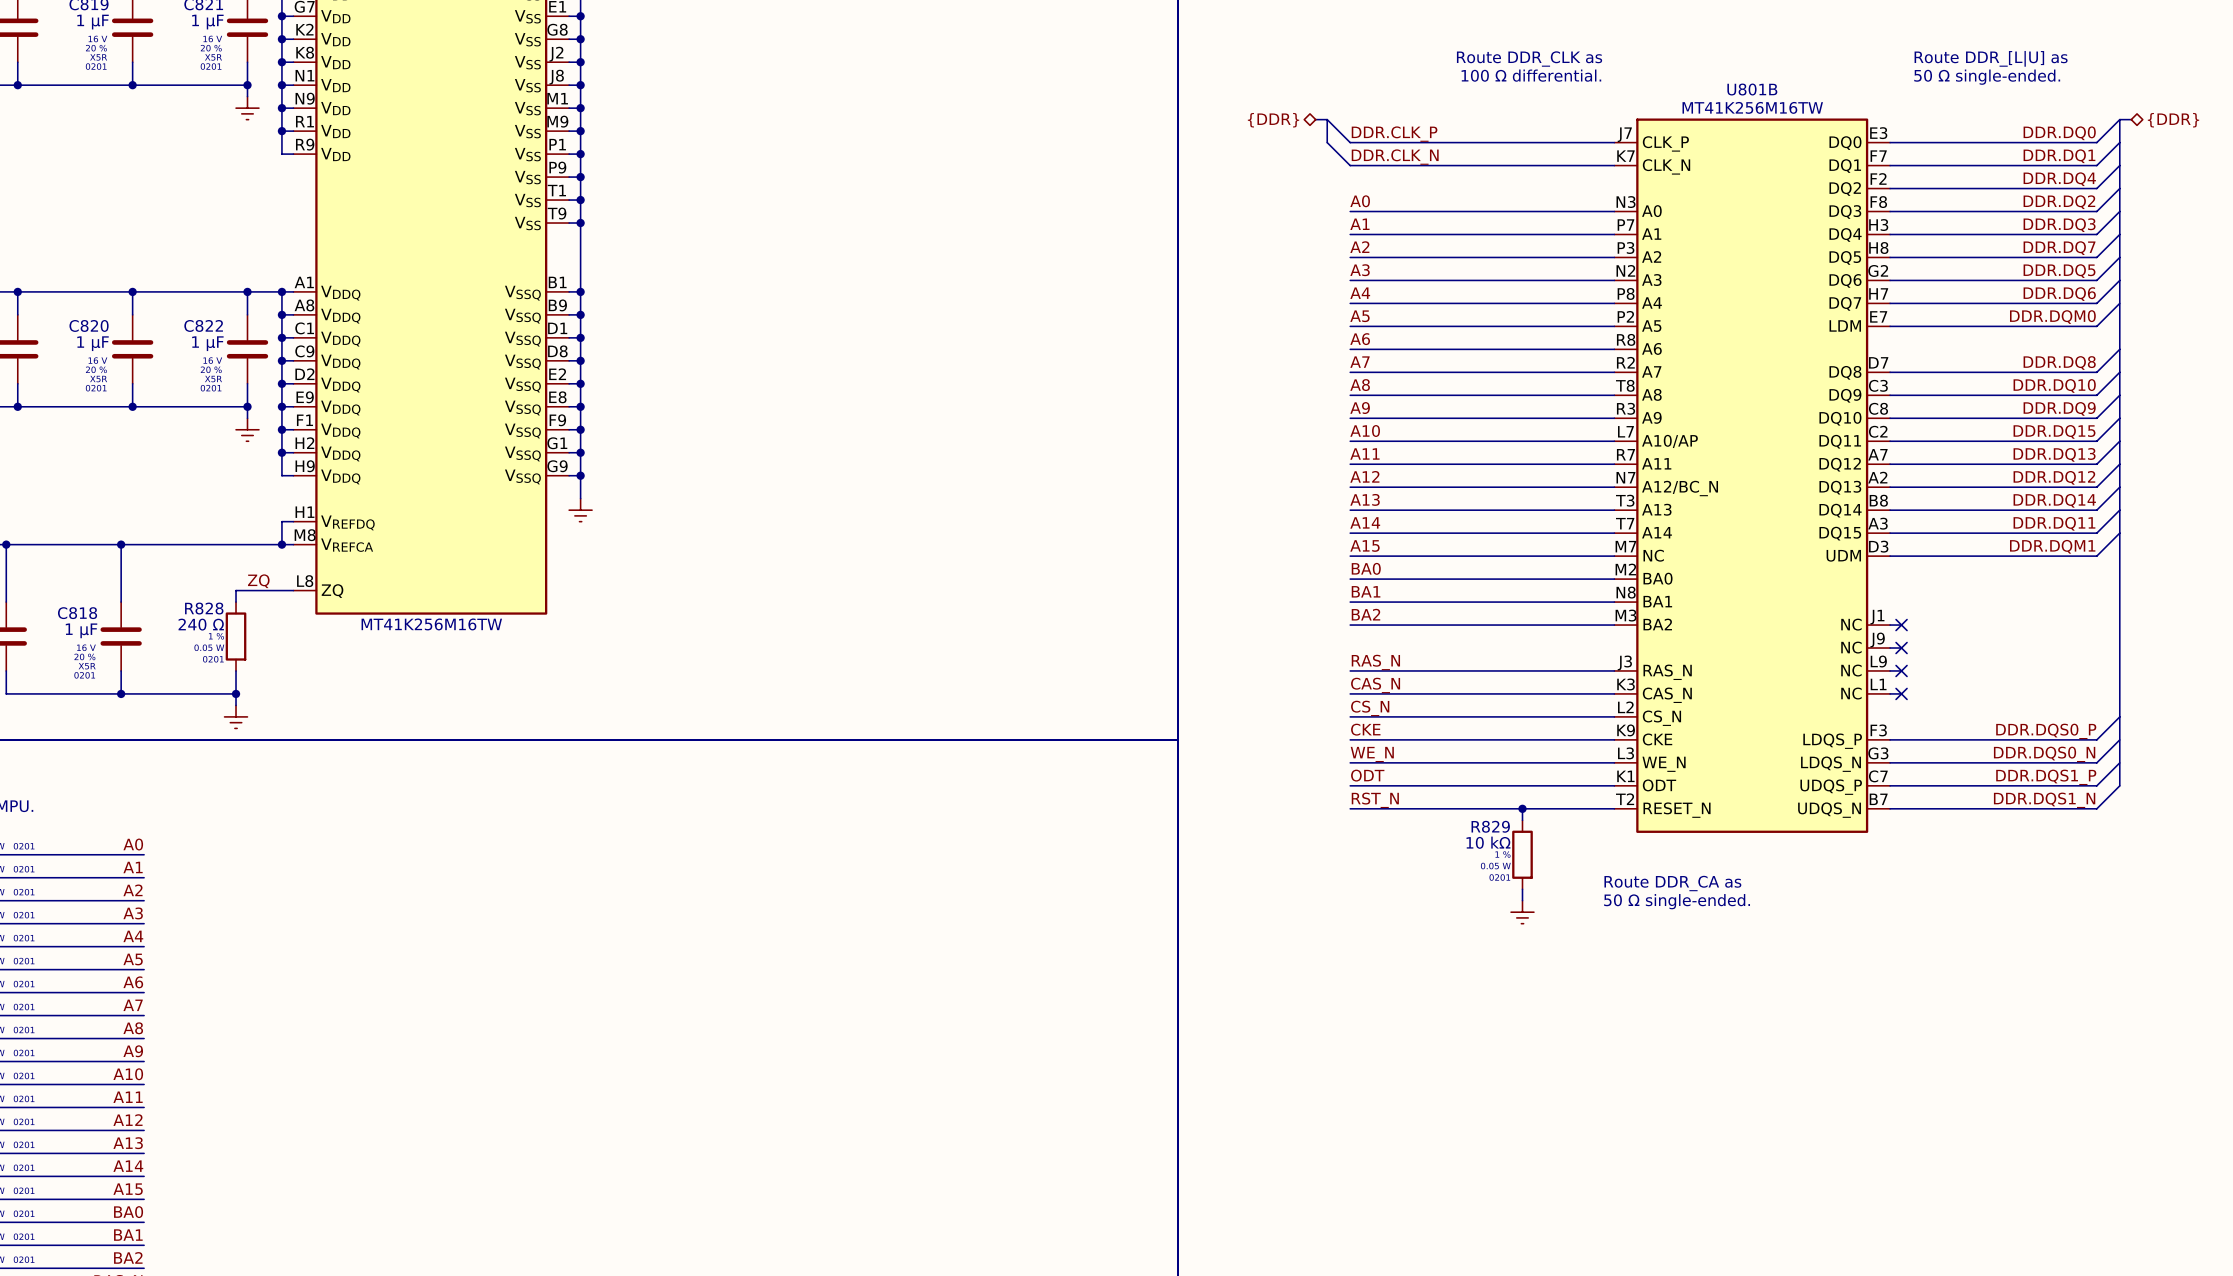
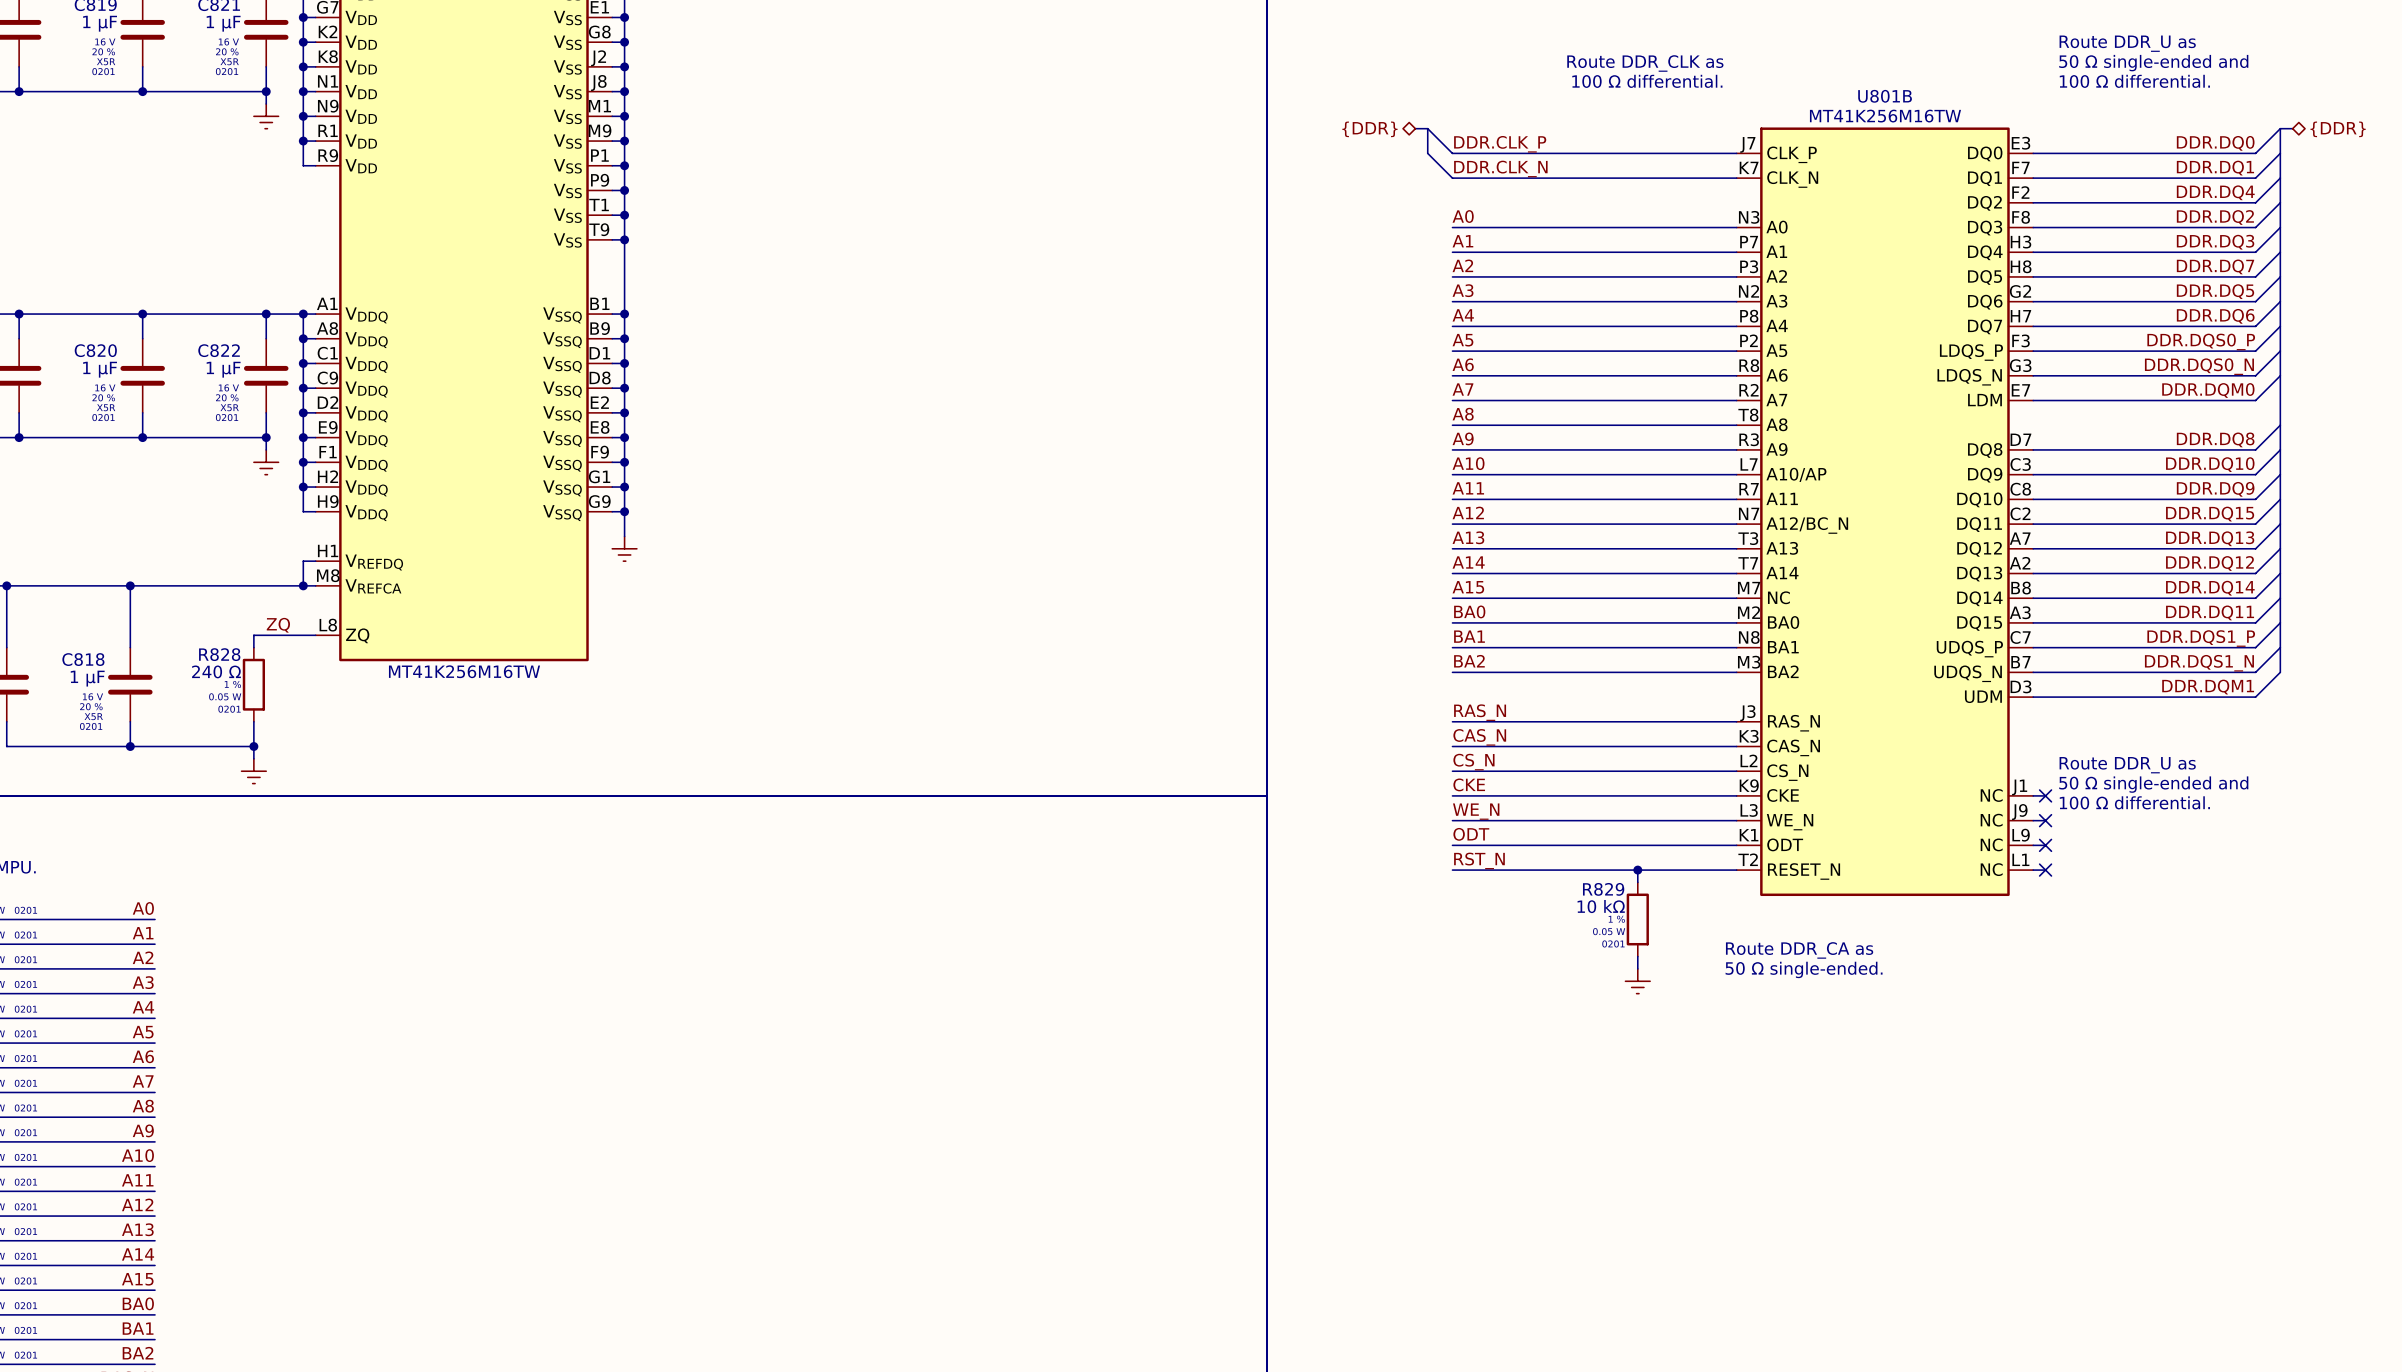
text: none -> Route DDR_U as (2127, 43)
text: Route DDR_[L|U] as (1991, 58) -> 50 Ω single-ended and (2153, 63)
text: 50 Ω single-ended. (1987, 77) -> 100 Ω differential. (2134, 81)
U801B symbol: [1614, 118, 1891, 833] -> [1736, 127, 2034, 897]
label: DDR.DQM0 (2052, 317) -> DDR.DQS0_P (2201, 341)
label: none -> DDR.DQS0_N (2199, 366)
label: DDR.DQ8 (2059, 362) -> DDR.DQM0 (2208, 390)
wire: (2119, 372) (2096, 395) (1890, 395) -> (2280, 351) (2255, 375) (2033, 375)
label: DDR.DQ10 (2054, 385) -> none
label: DDR.DQ9 (2059, 408) -> DDR.DQ8 (2215, 439)
label: DDR.DQ15 (2054, 431) -> DDR.DQ10 (2210, 464)
label: DDR.DQ13 (2054, 454) -> DDR.DQ9 (2215, 489)
label: DDR.DQ12 (2054, 477) -> DDR.DQ15 (2210, 514)
label: DDR.DQ14 (2054, 500) -> DDR.DQ13 (2210, 538)
label: DDR.DQ11 (2054, 523) -> DDR.DQ12 (2209, 563)
label: DDR.DQM1 (2052, 546) -> DDR.DQ14 (2210, 588)
wire: none -> (2280, 598) (2255, 622) (2033, 622)
label: none -> DDR.DQ11 (2210, 612)
wire: none -> (2280, 622) (2255, 647) (2033, 647)
no-connect mark: (1901, 625) -> none
bus: (2119, 625) (2119, 785) -> none
label: none -> DDR.DQM1 (2208, 687)
no-connect mark: (1901, 648) -> none
wire: (1890, 670) (1901, 670) -> none
no-connect mark: (1901, 670) -> none
wire: (1890, 693) (1901, 693) -> none
no-connect mark: (1901, 693) -> none
text: none -> Route DDR_U as (2127, 765)
wire: (2119, 716) (2096, 739) (1901, 739) -> (2280, 647) (2255, 672) (2045, 672)
text: none -> 50 Ω single-ended and (2153, 784)
label: DDR.DQS0_P (2046, 731) -> none
no-connect mark: none -> (2045, 795)
wire: (2119, 739) (2096, 762) (1901, 762) -> (2280, 672) (2255, 697) (2045, 697)
text: none -> 100 Ω differential. (2134, 802)
label: DDR.DQS0_N (2044, 754) -> none
no-connect mark: none -> (2045, 820)
wire: (2119, 762) (2096, 785) (1901, 785) -> none
label position: DDR.DQS1_P (2046, 777) -> DDR.DQS1_P (2201, 638)
no-connect mark: none -> (2045, 845)
wire: (2119, 785) (2096, 808) (1901, 808) -> none
label position: DDR.DQS1_N (2044, 800) -> DDR.DQS1_N (2199, 663)
no-connect mark: none -> (2045, 870)

